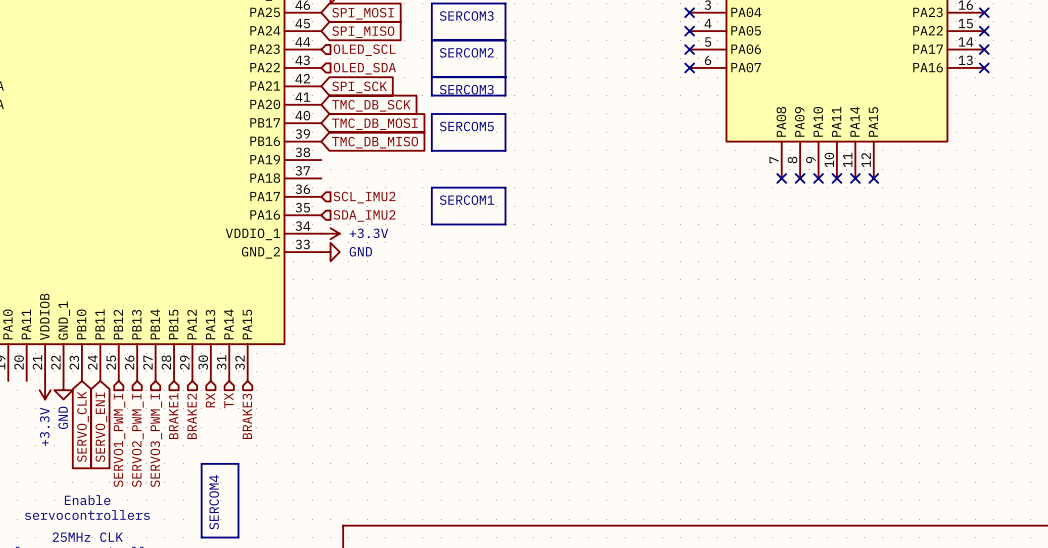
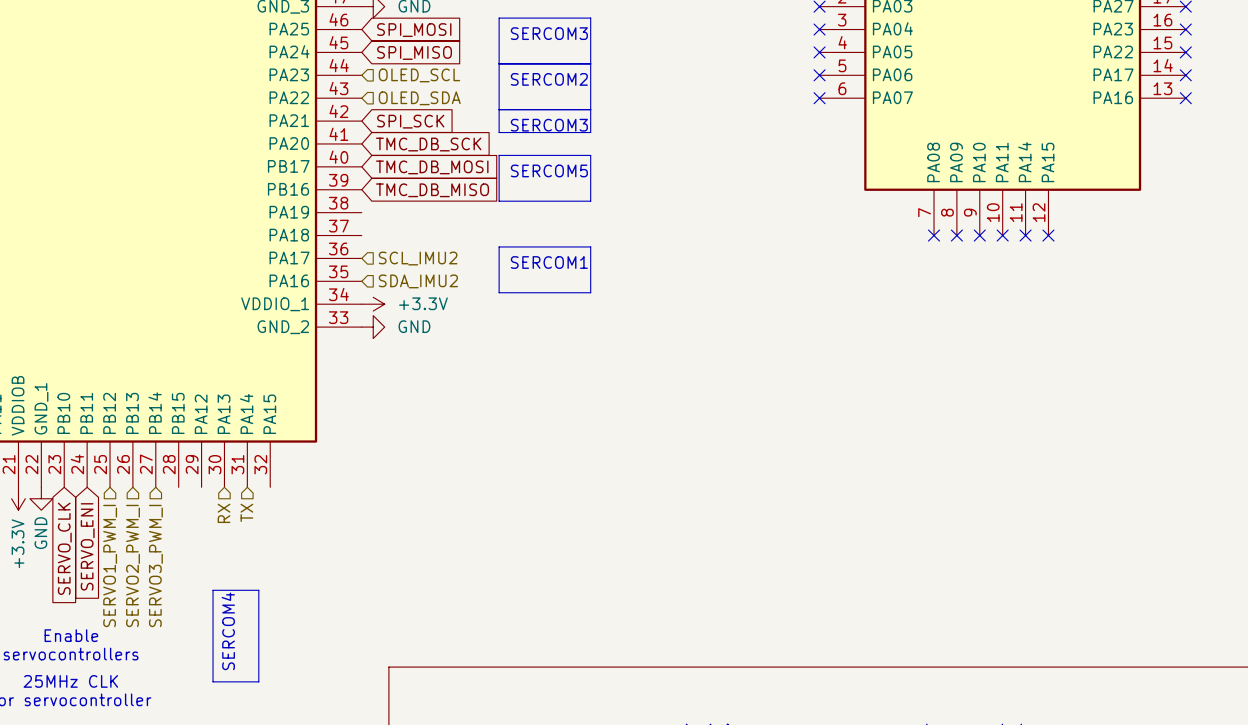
hierarchical label: BRAKE1 (173, 416) -> none
hierarchical label: BRAKE2 (192, 416) -> none
hierarchical label: BRAKE3 (247, 416) -> none

